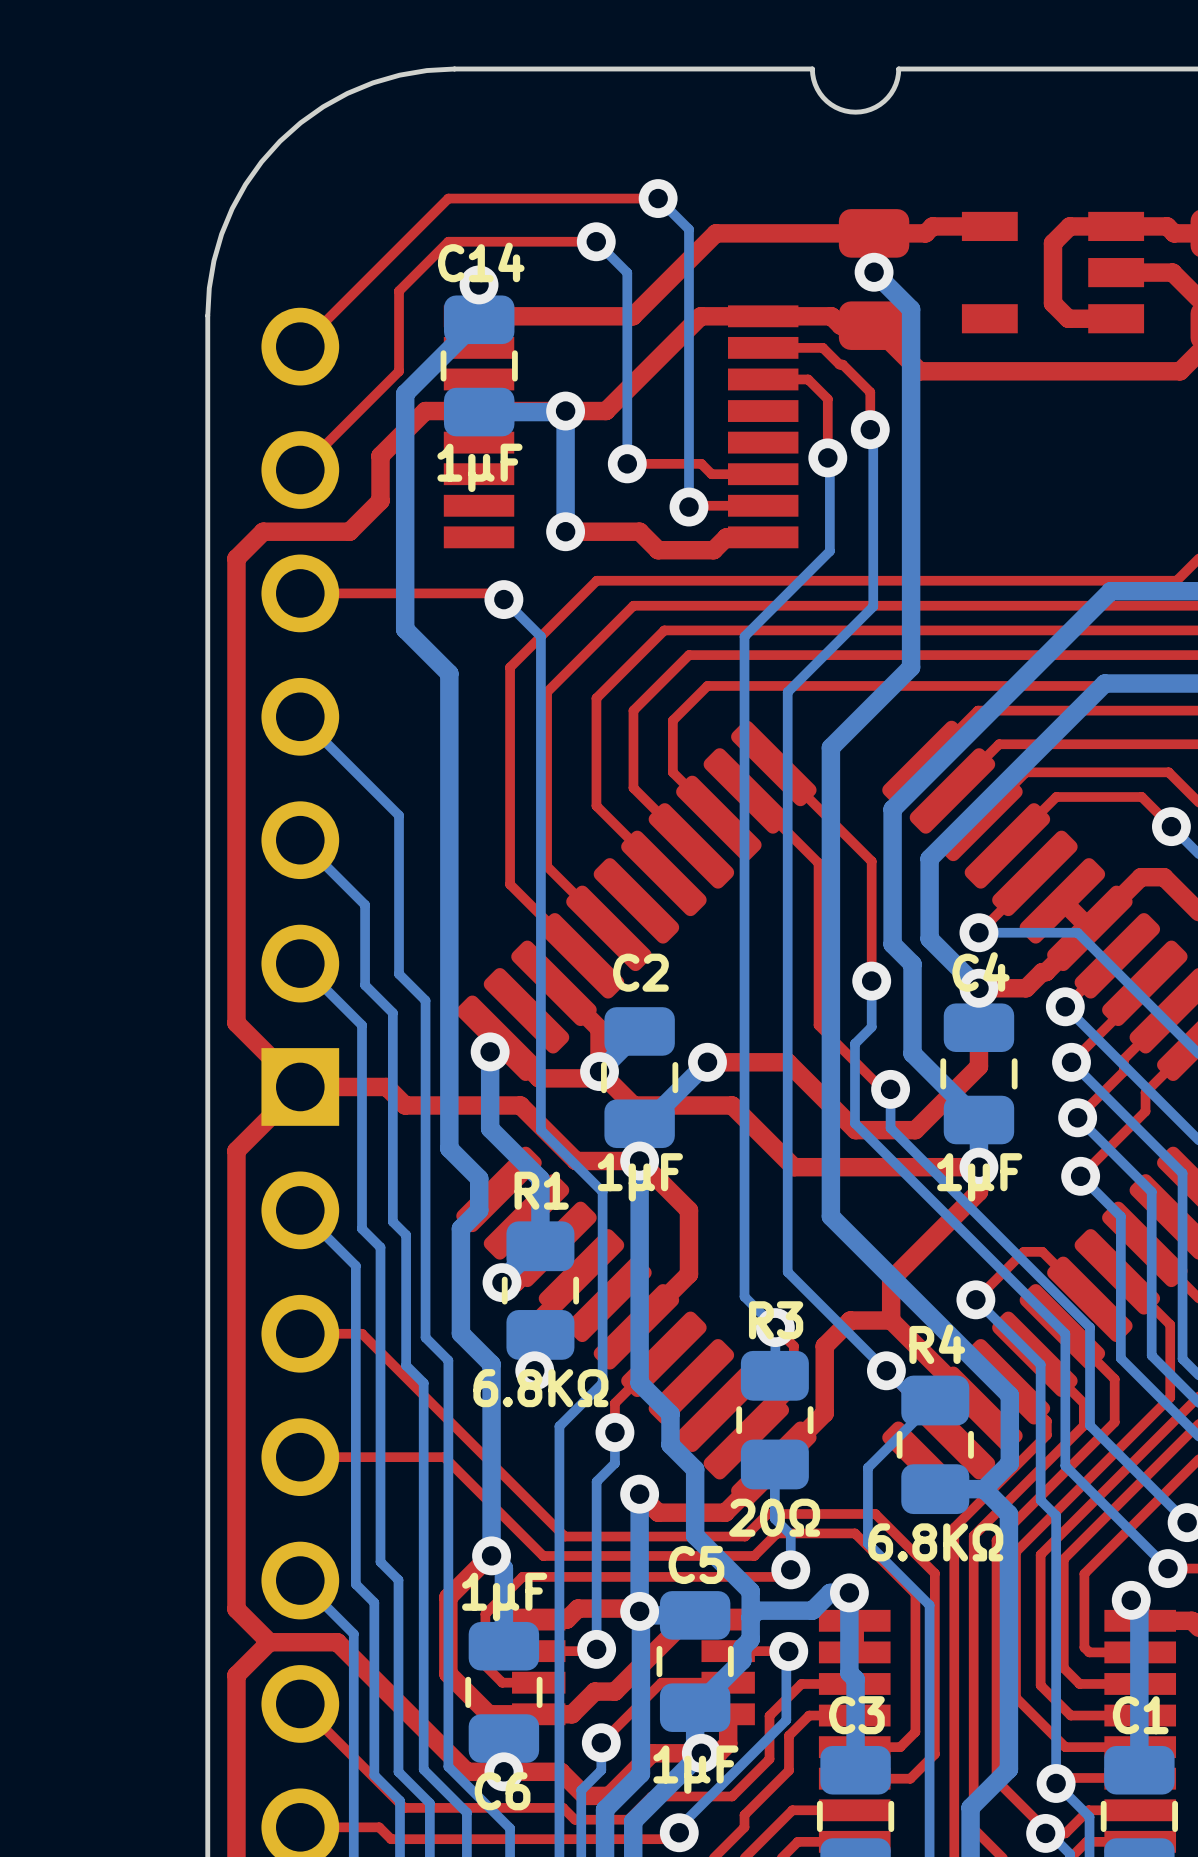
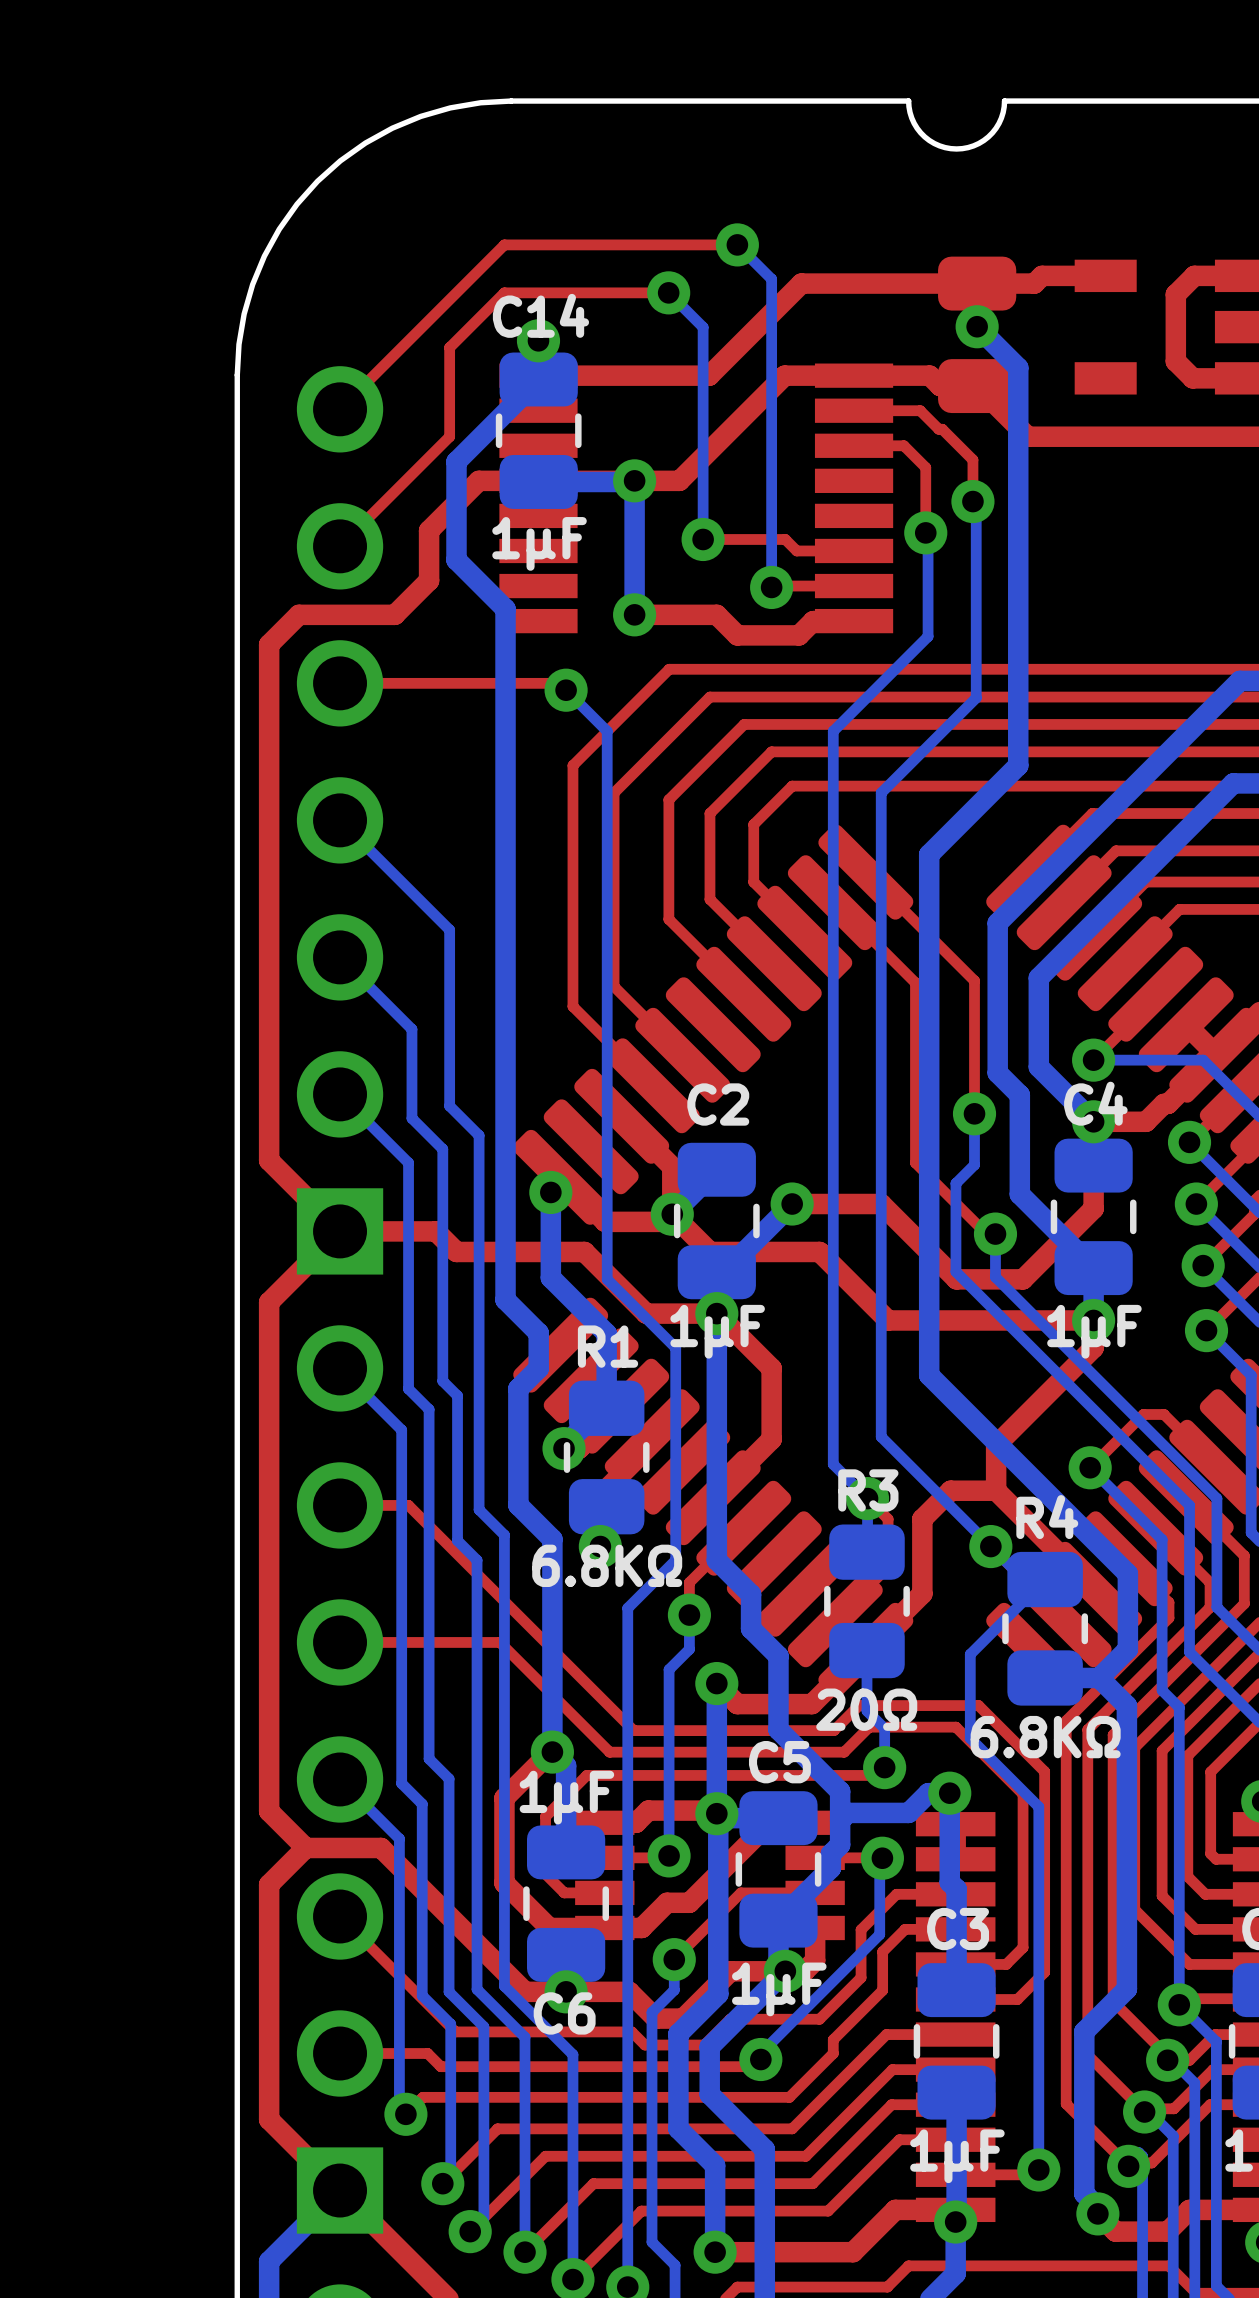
bottom track: (405, 482) (405, 629) (449, 673) -> (456, 560) (505, 609) (505, 772)

